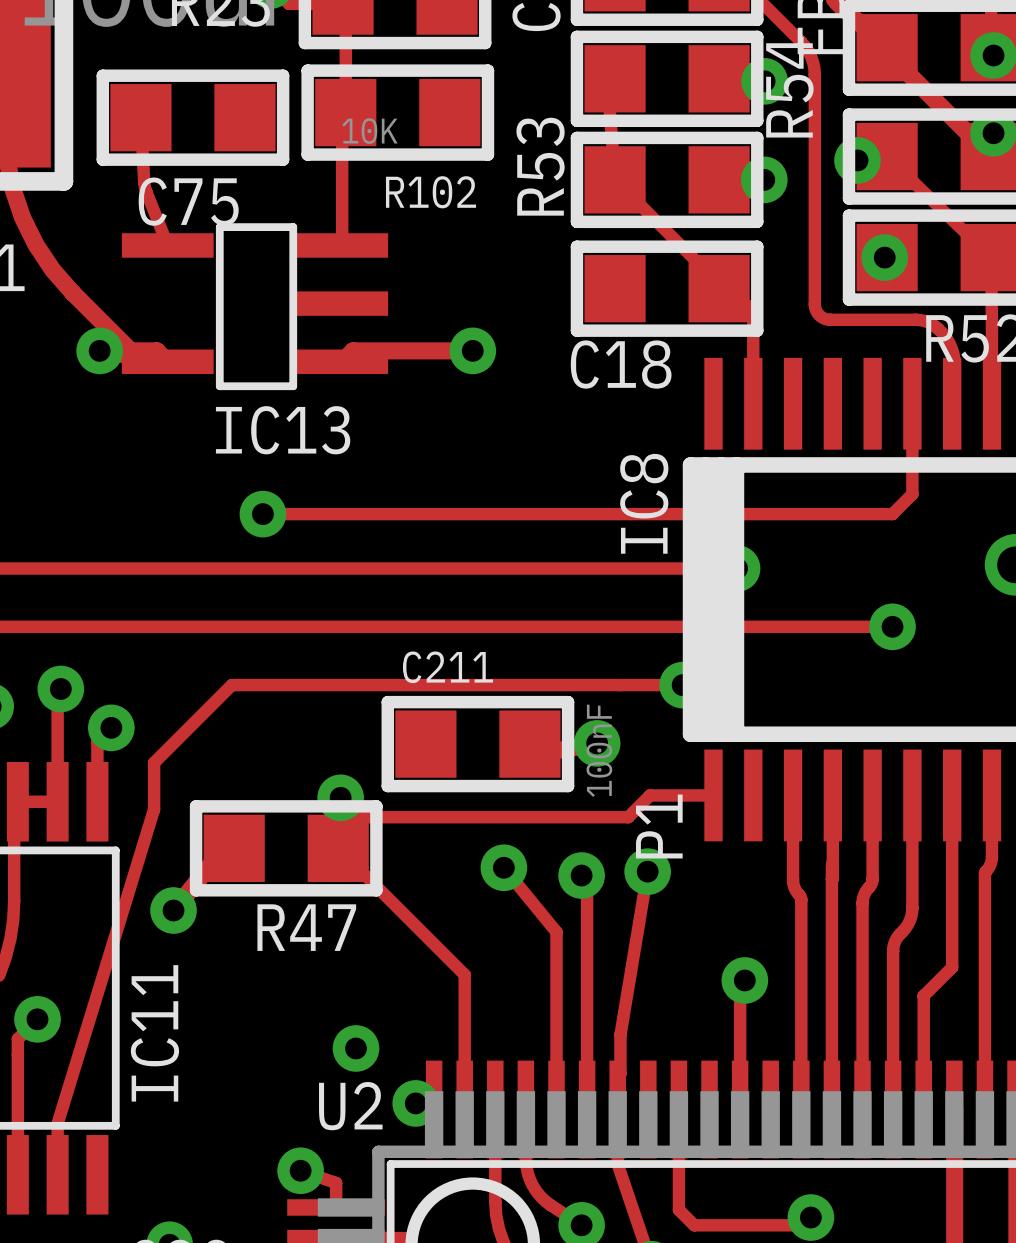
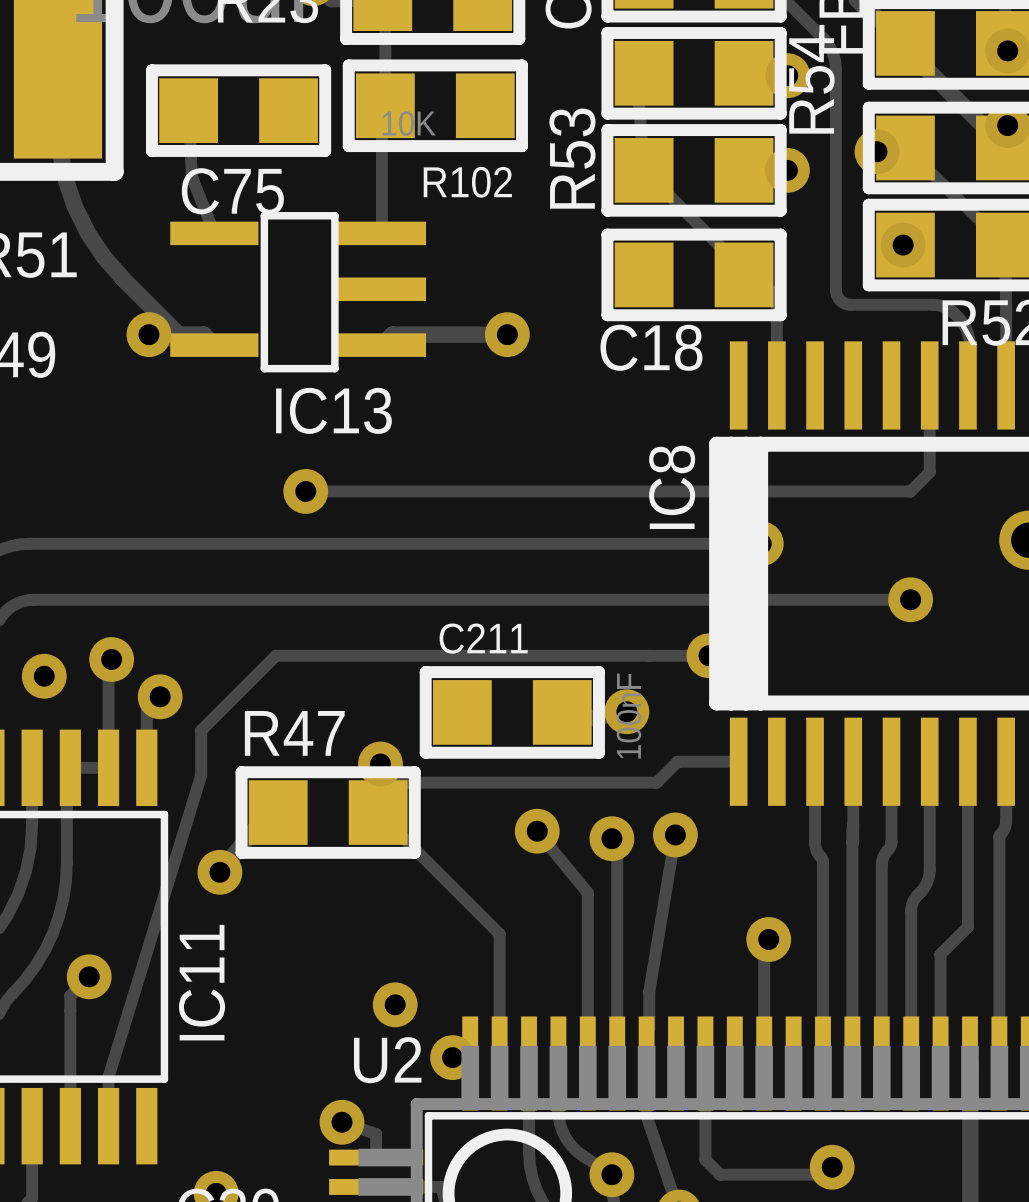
text: P1 (659, 826) -> none
R47 name position: R47 (306, 927) -> R47 (294, 733)

